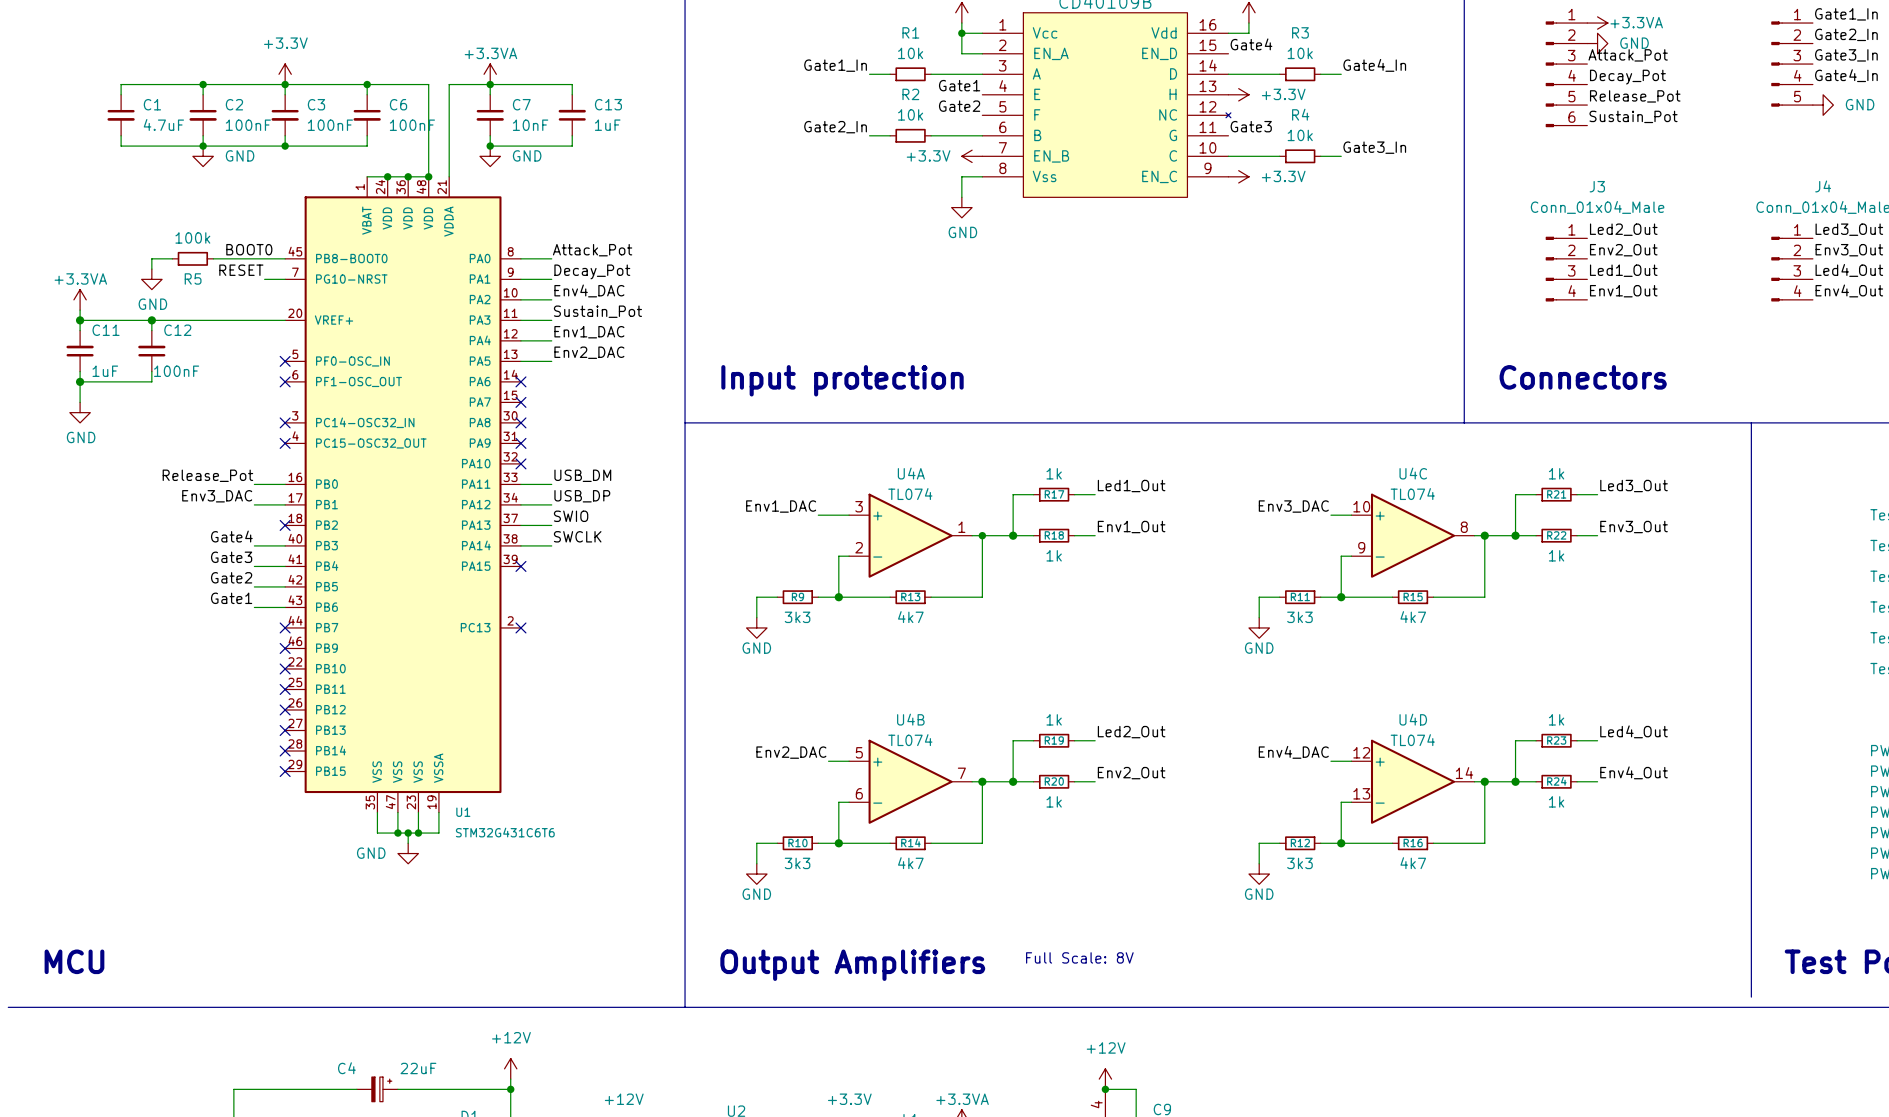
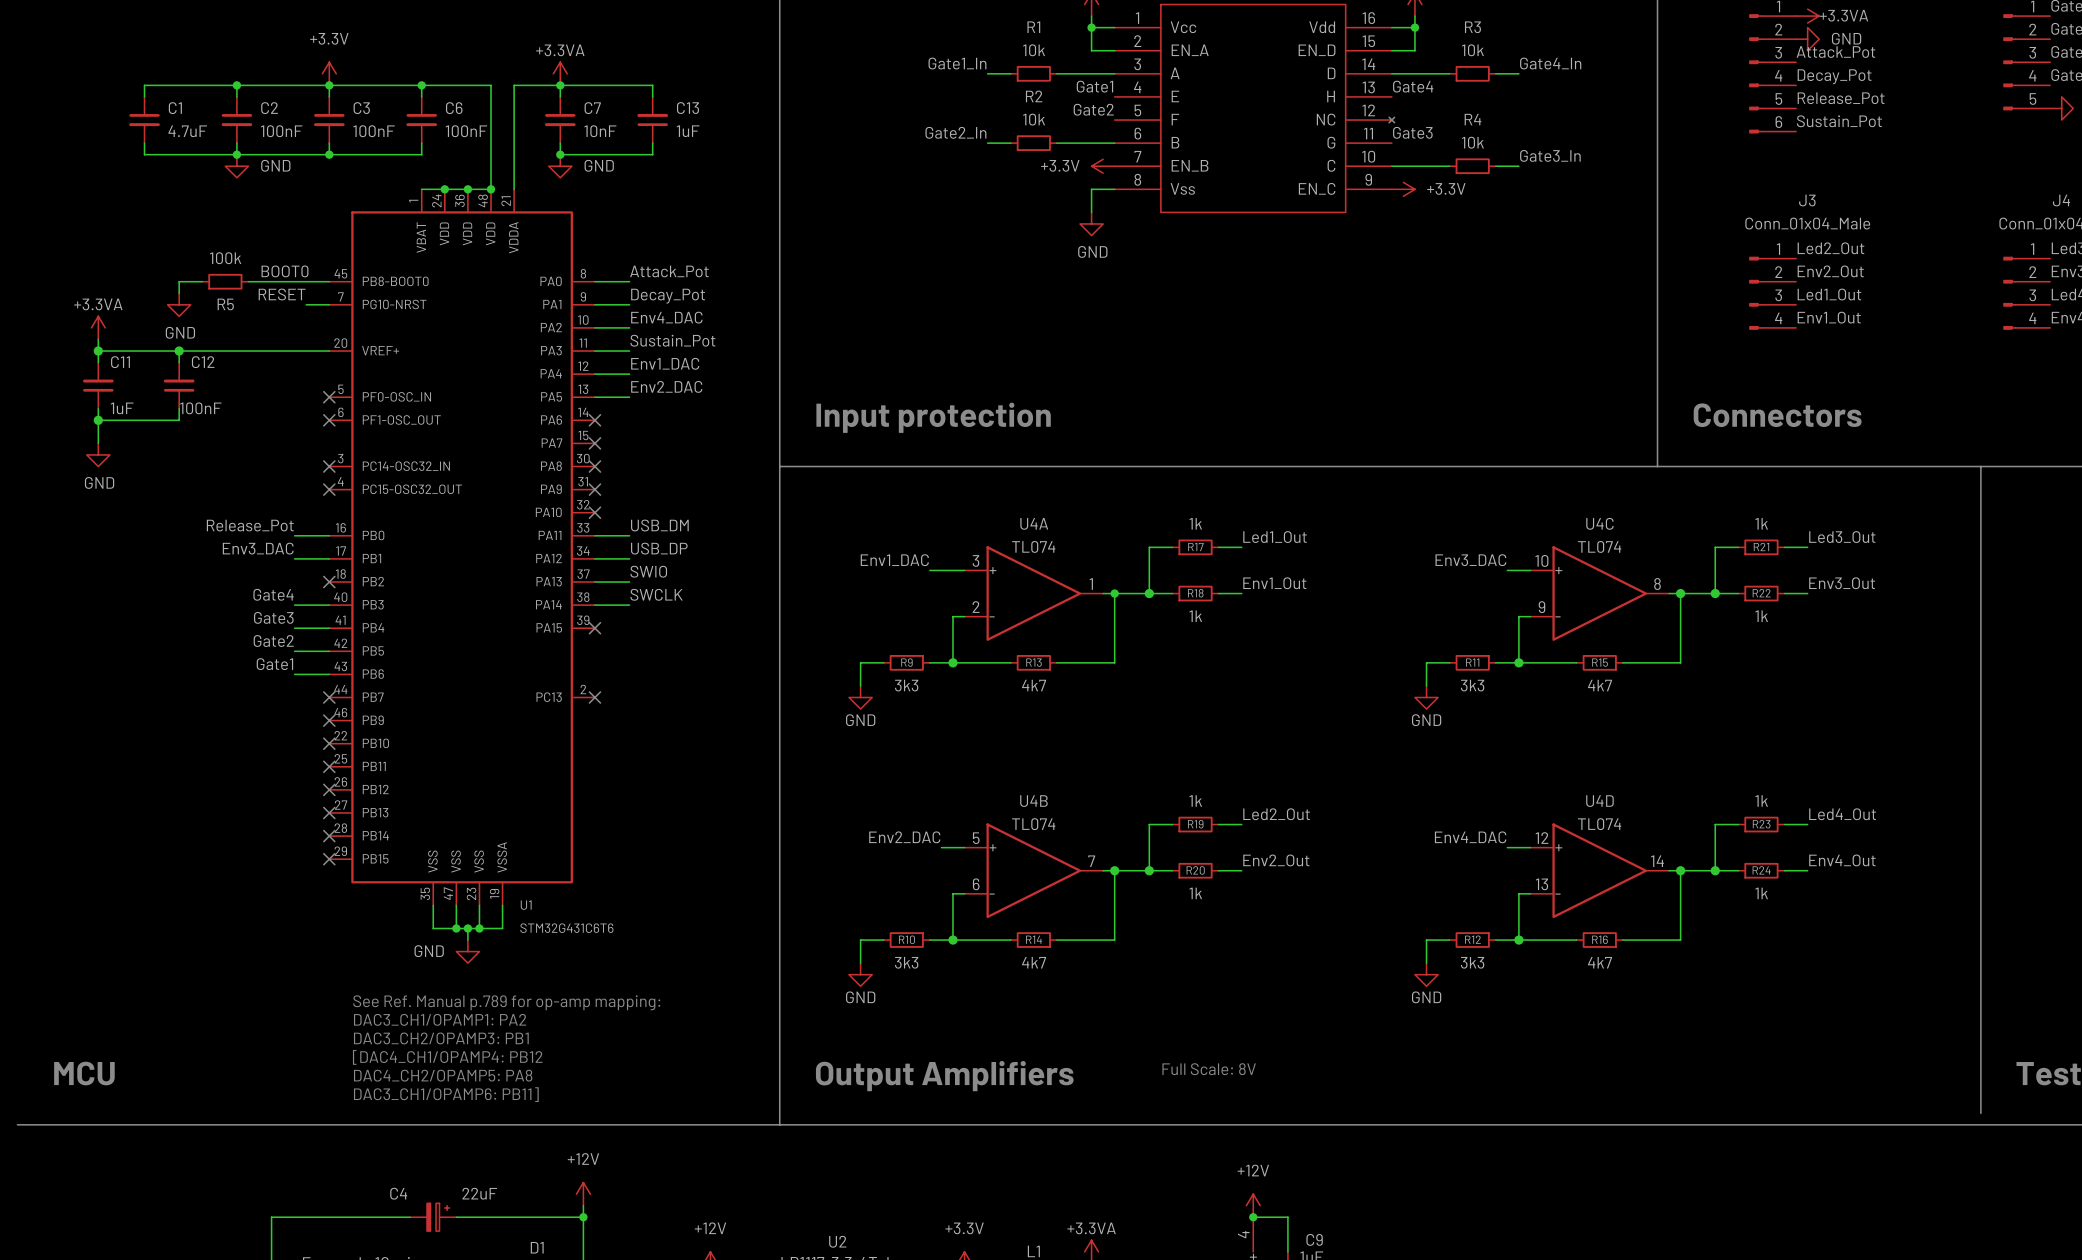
wire: none -> (1414, 27) (1414, 50) (1391, 50)
junction: none -> (1414, 27)
label position: Gate4 (1251, 44) -> Gate4 (1413, 86)
power symbol: +3.3V (1238, 94) -> none
text: none -> See Ref. Manual p.789 for op-amp mapping: (506, 1002)
text: none -> DAC3_CH1/OPAMP1: PA2 (440, 1019)
text: none -> DAC3_CH2/OPAMP3: PB1 (441, 1038)
text: none -> [DAC4_CH1/OPAMP4: PB12 (447, 1057)
text: none -> DAC4_CH2/OPAMP5: PA8 (443, 1075)
text: none -> DAC3_CH1/OPAMP6: PB11] (446, 1094)

